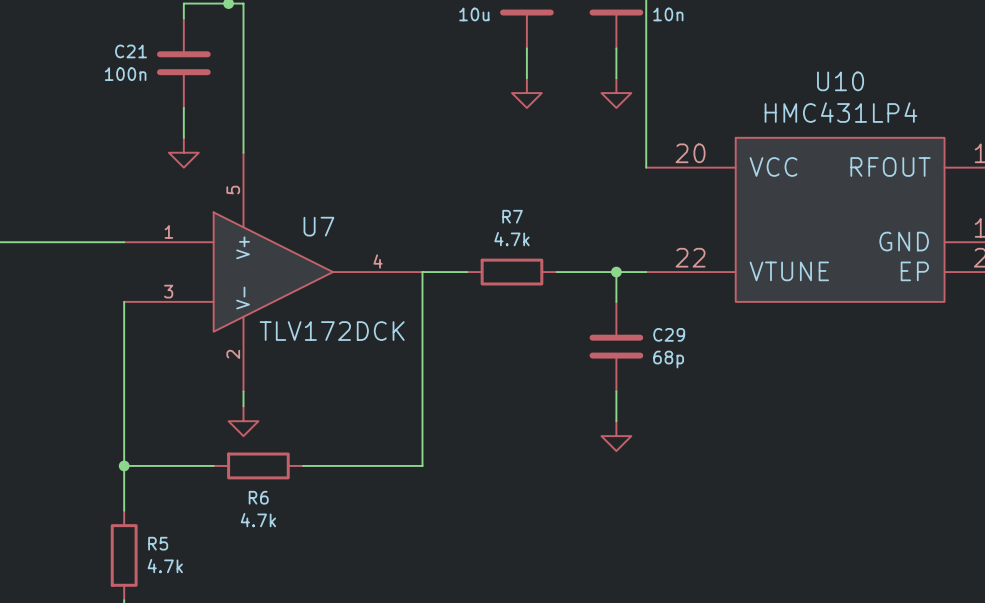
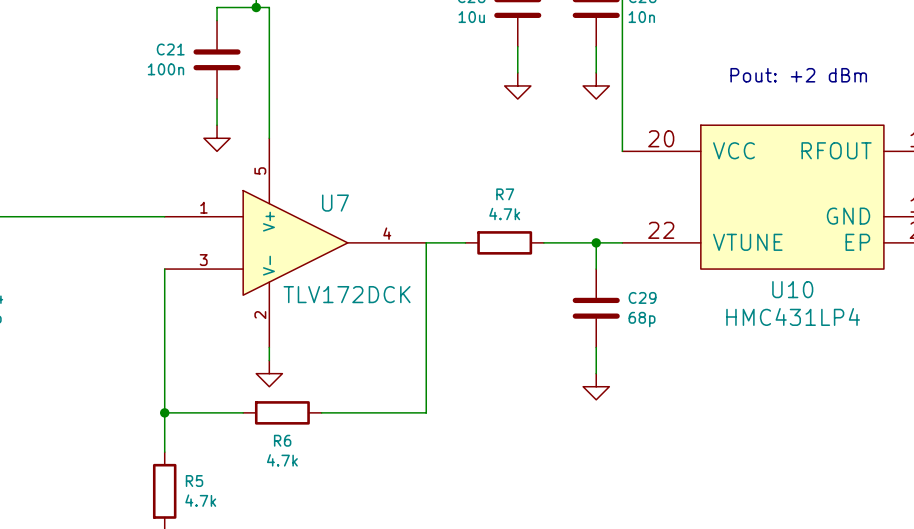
text: none -> Pout: +2 dBm (798, 75)
U10 name position: U10 (840, 81) -> U10 (792, 289)
U10 value position: HMC431LP4 (840, 112) -> HMC431LP4 (793, 316)

